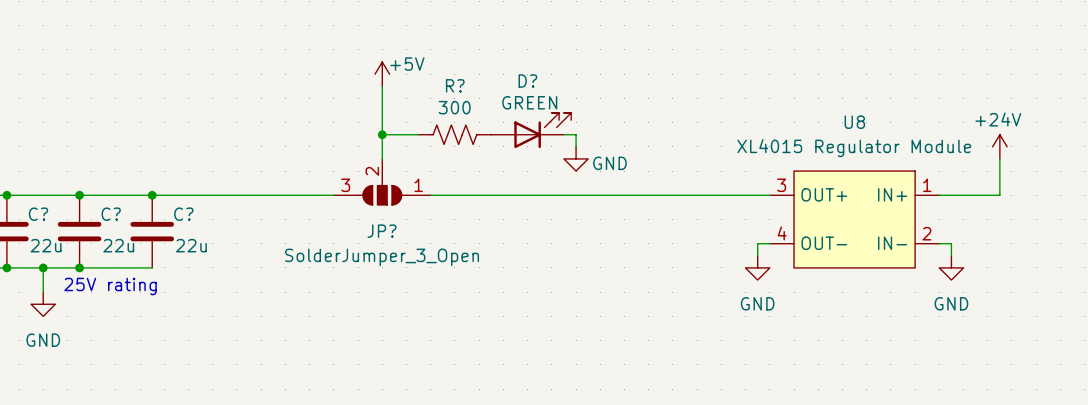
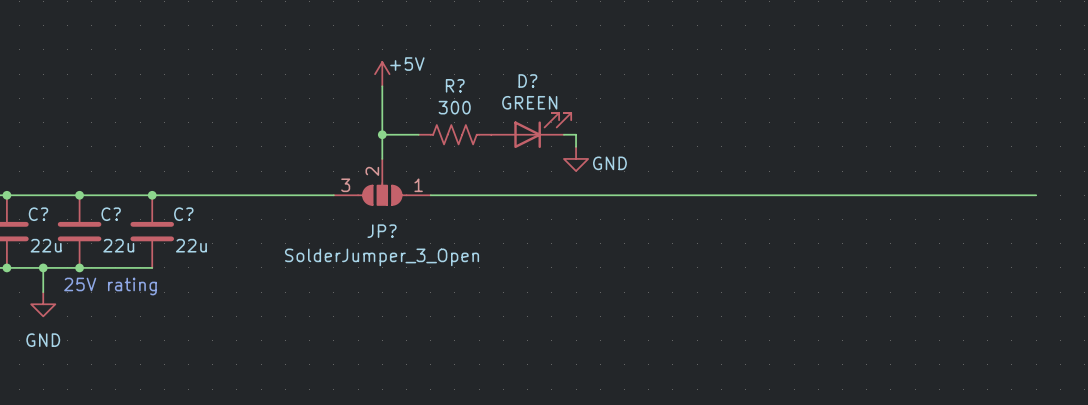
power symbol: +24V (999, 146) -> none
wire: (999, 158) (999, 195) -> (1036, 195) (999, 195)
U8: XL4015 Regulator Module (854, 219) -> none
wire: (769, 243) (757, 243) (757, 255) -> none
wire: (939, 243) (951, 243) (951, 255) -> none
power symbol: GND (757, 267) -> none
power symbol: GND (951, 267) -> none

